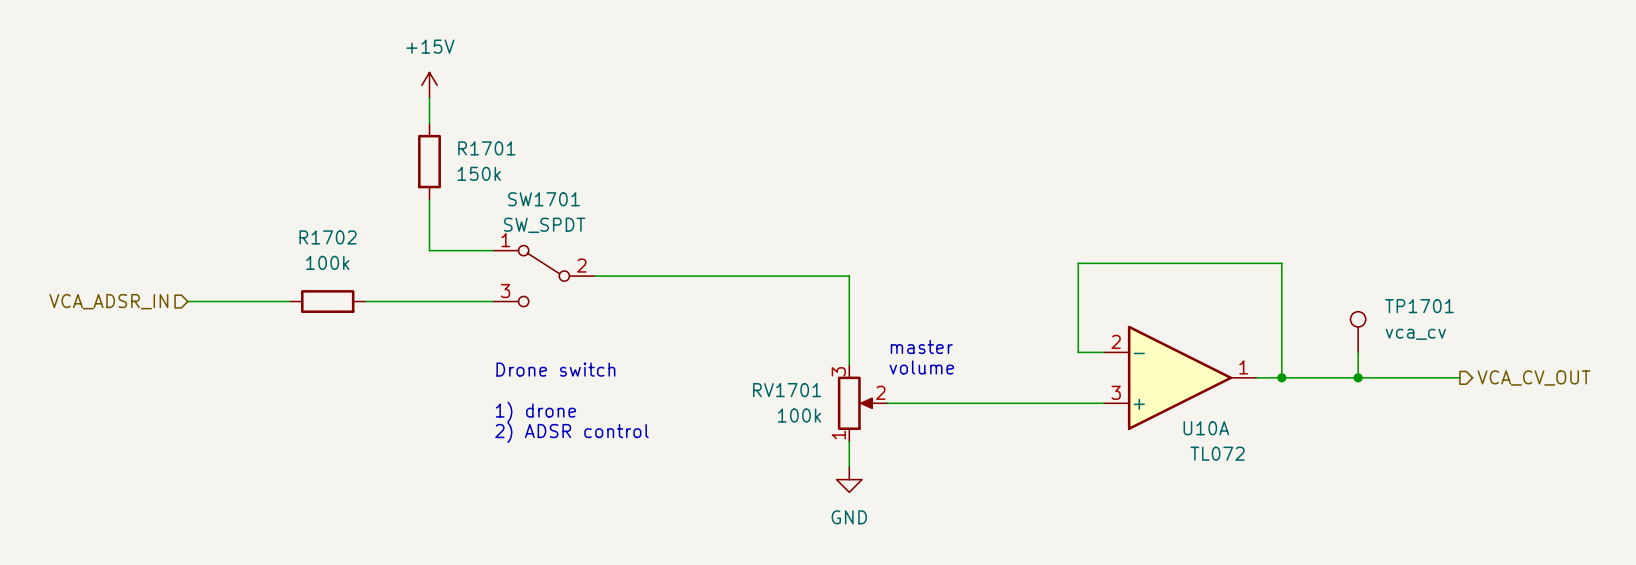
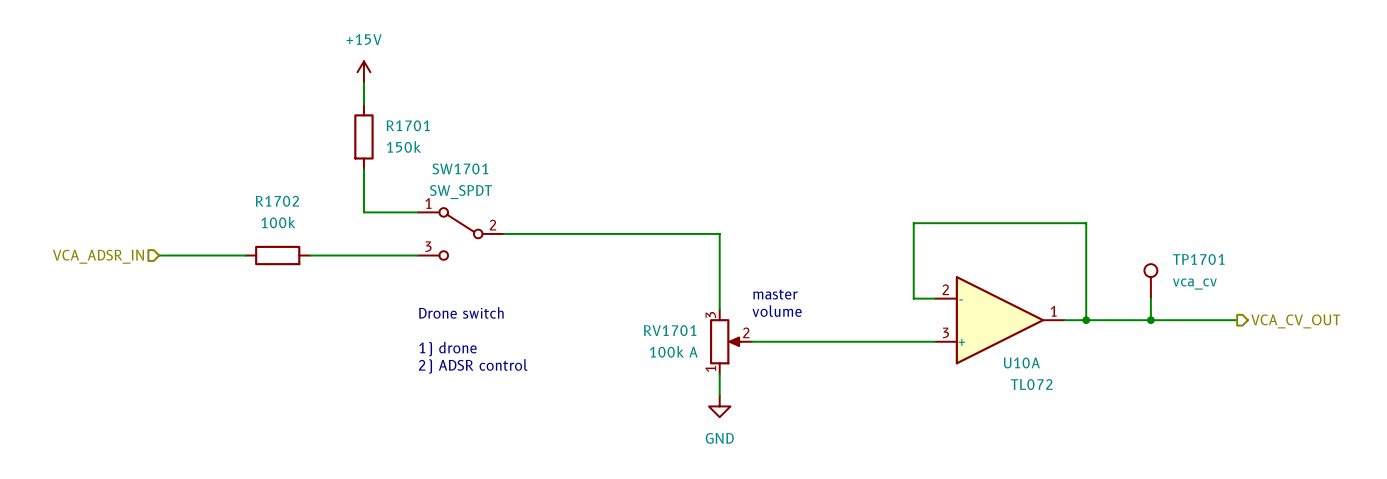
RV1701 value: 100k (799, 415) -> 100k A (673, 351)

